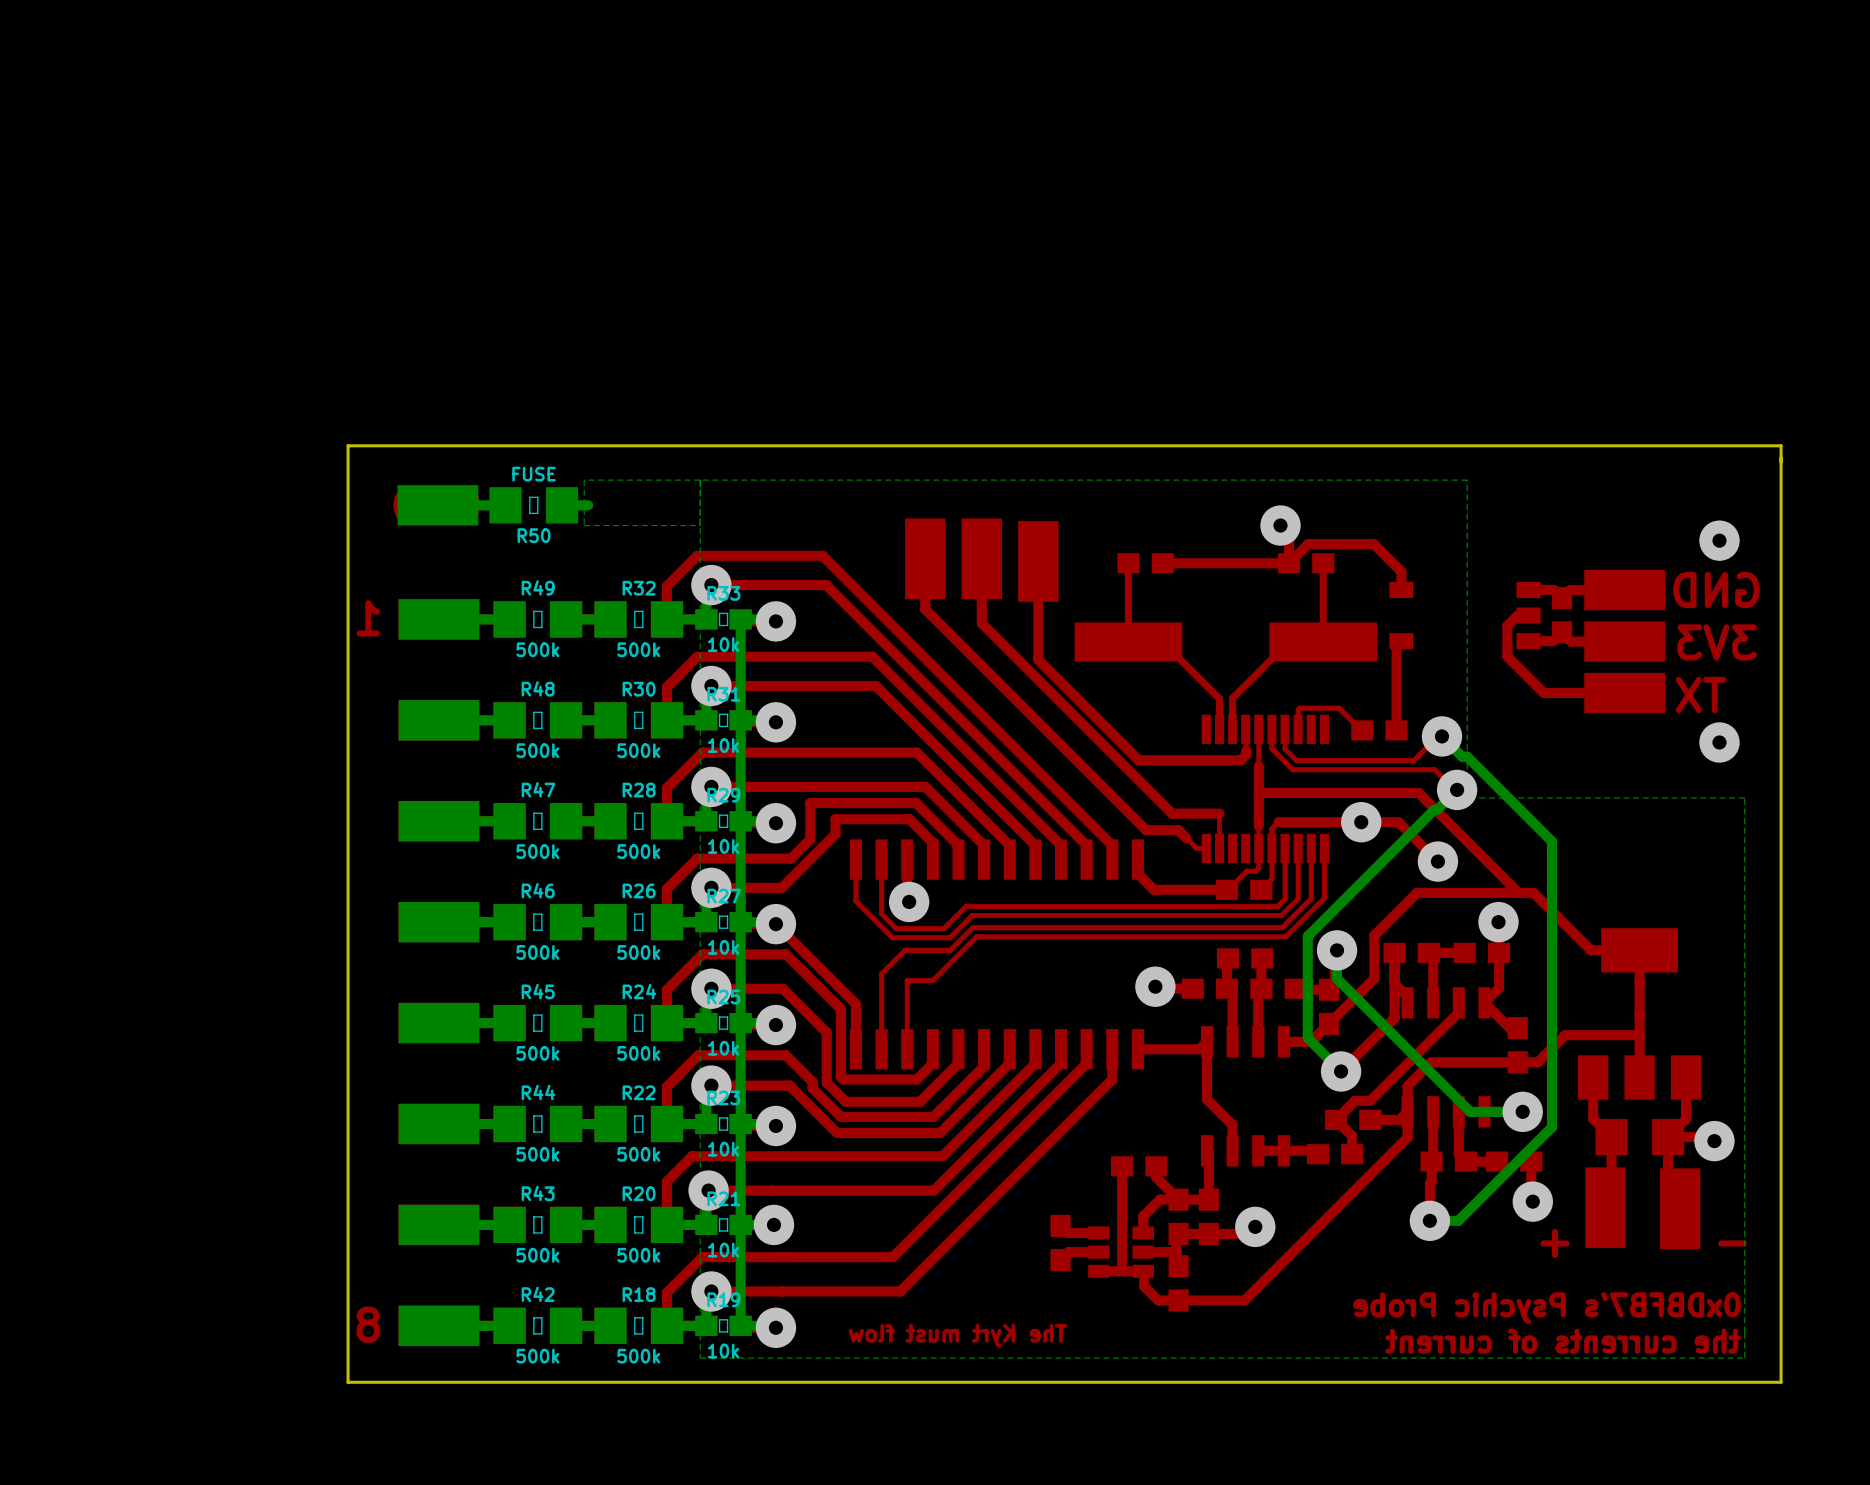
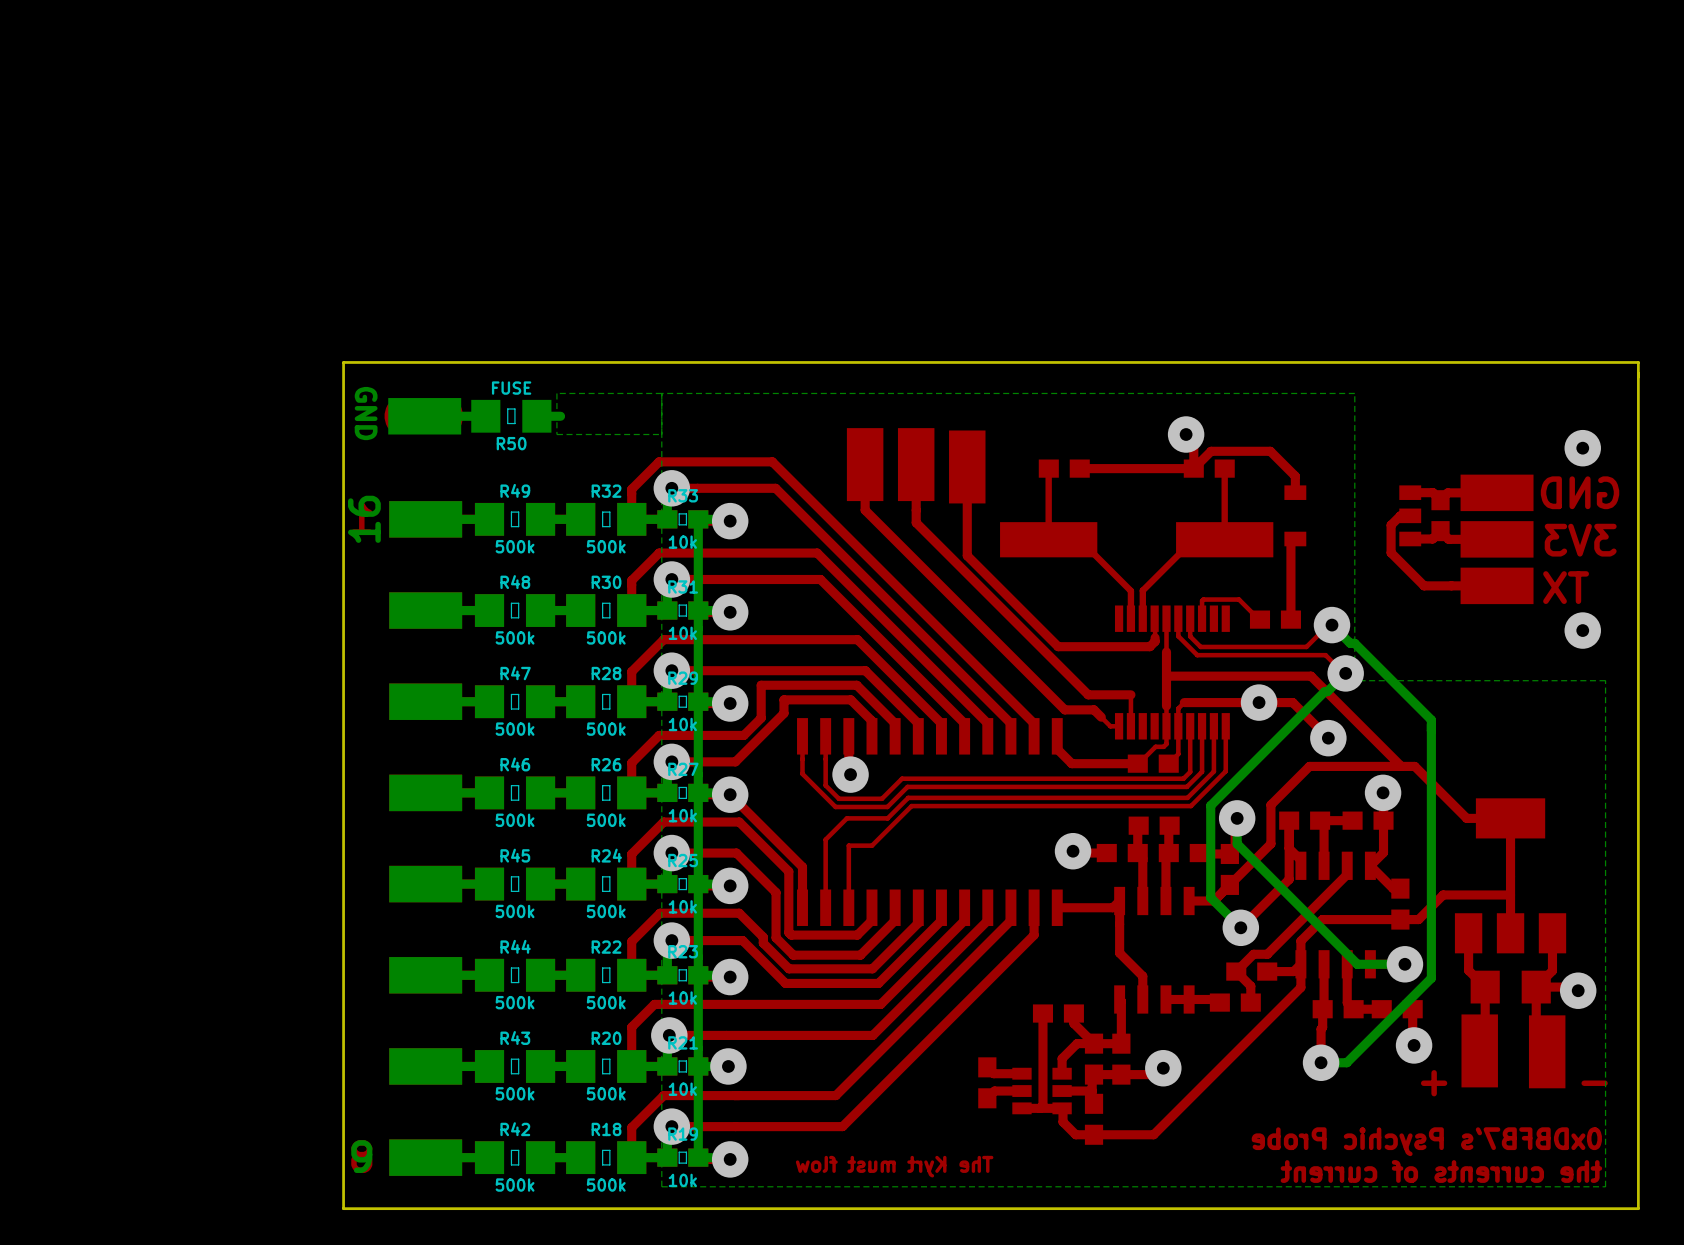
text: none -> GND (366, 413)
text: none -> 16 (364, 519)
text: none -> 9 (361, 1156)

